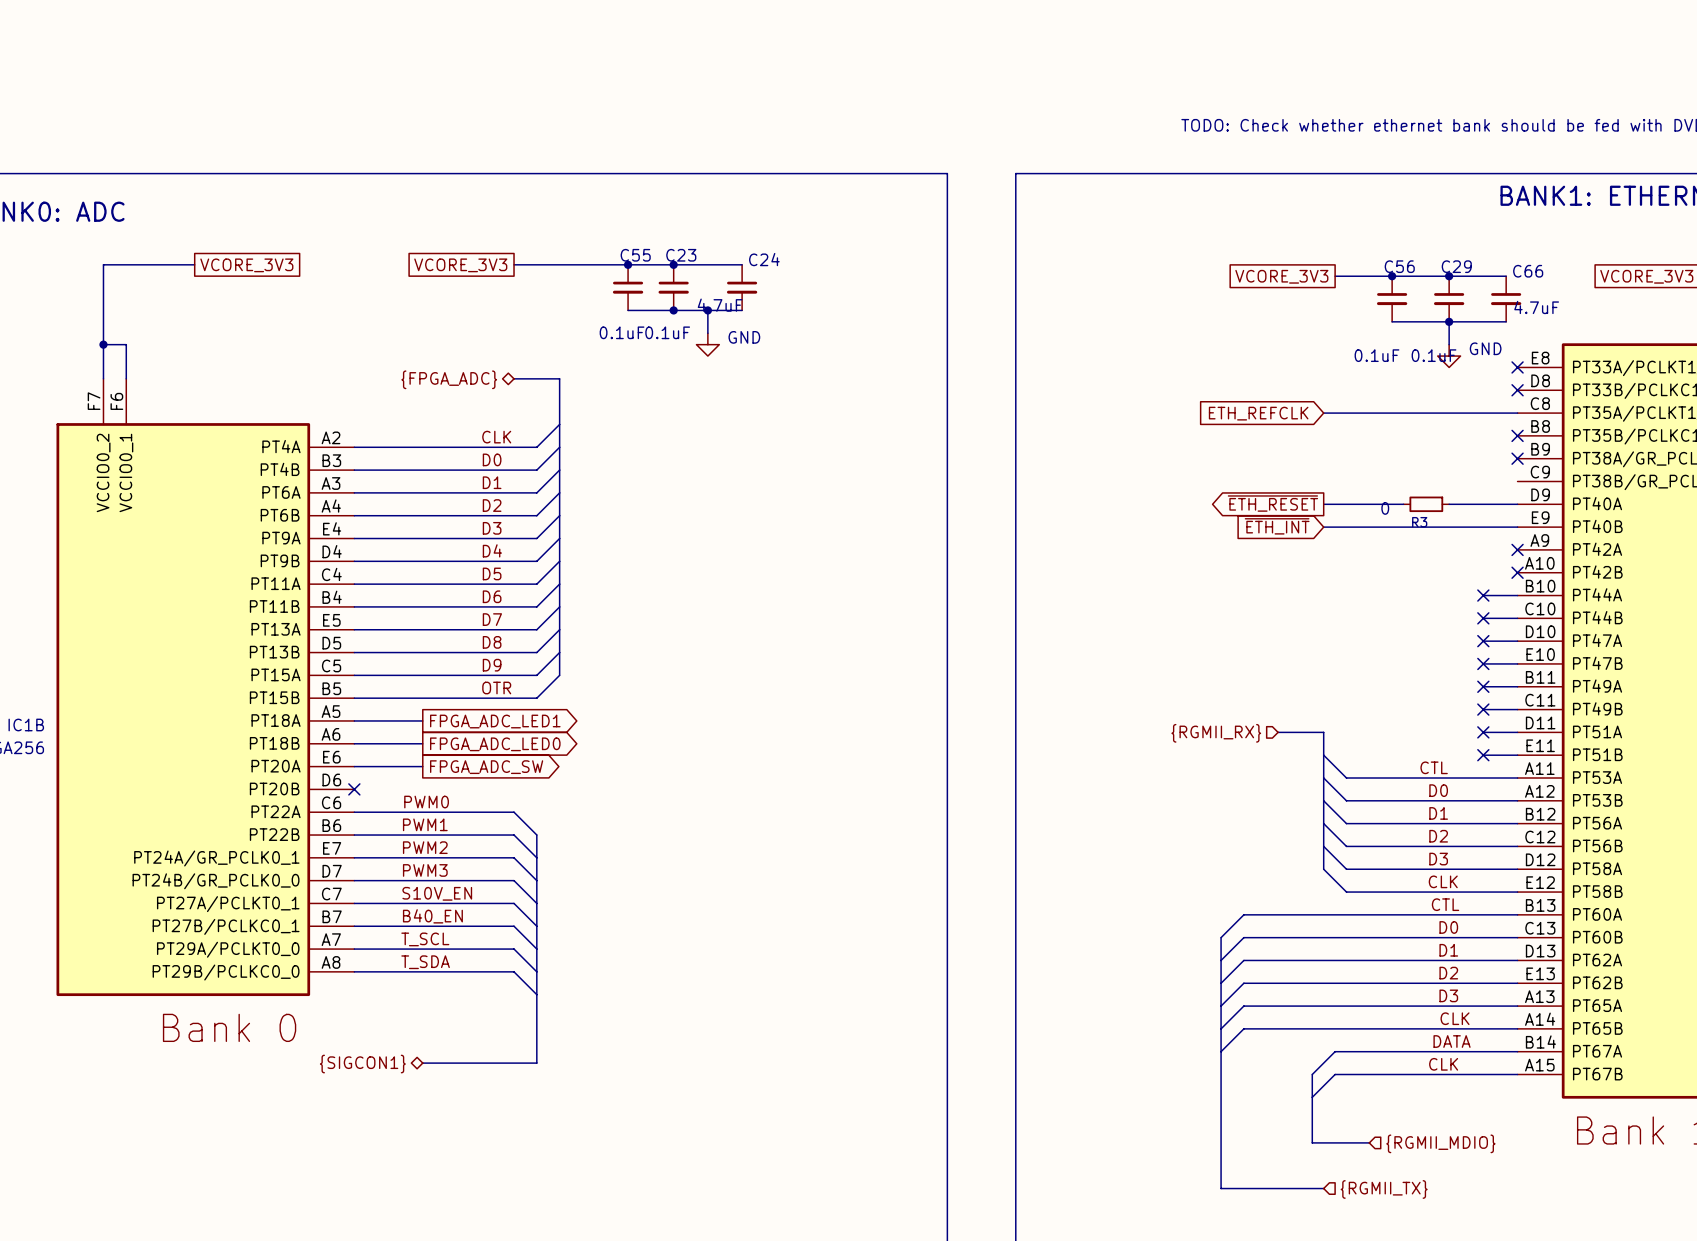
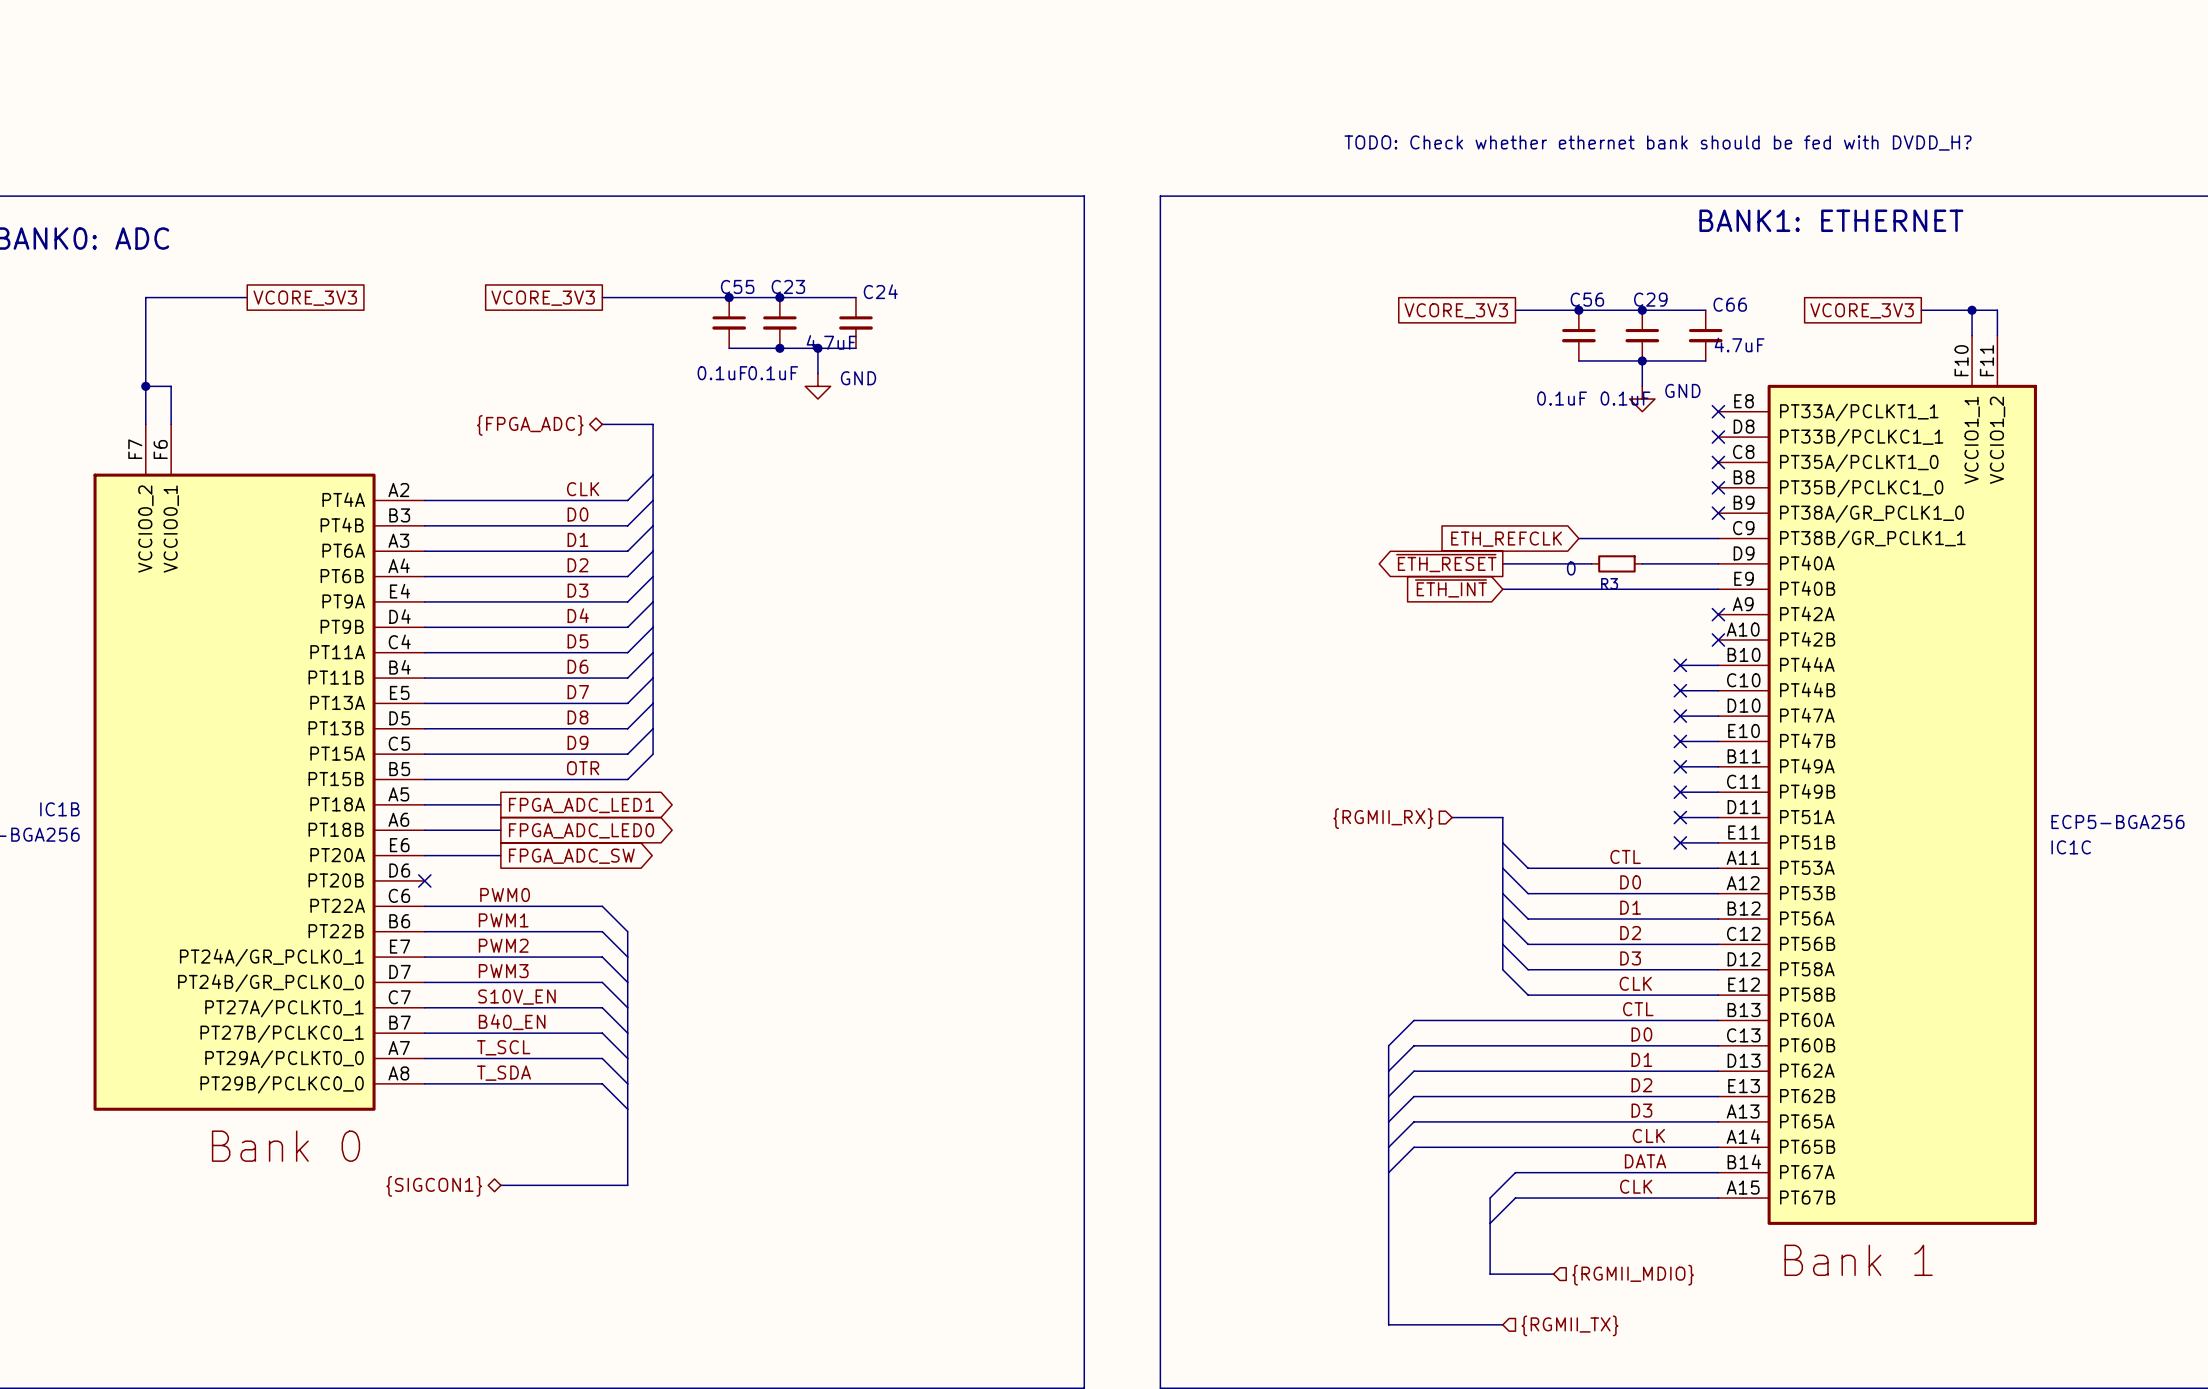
global label position: ETH_REFCLK (1258, 413) -> ETH_REFCLK (1506, 539)
wire: (1323, 413) (1517, 413) -> none
no-connect mark: none -> (1718, 462)
wire: none -> (1578, 538) (1718, 538)

